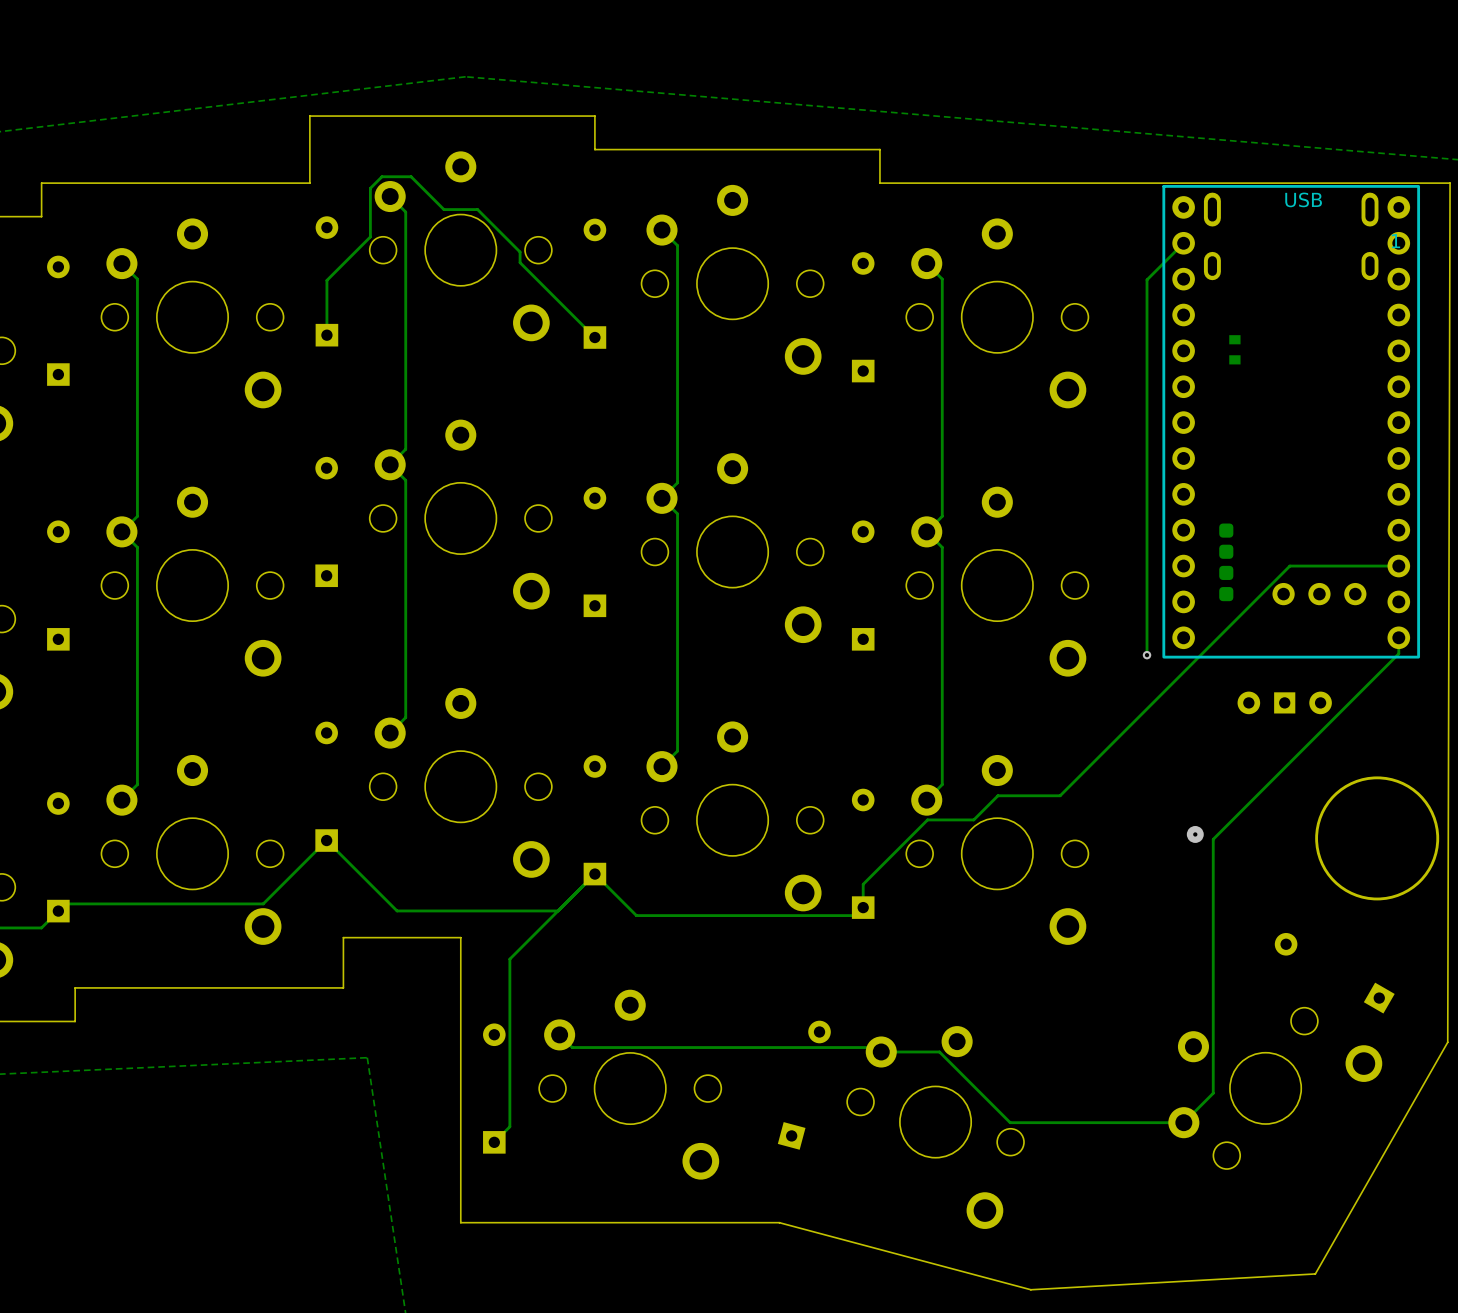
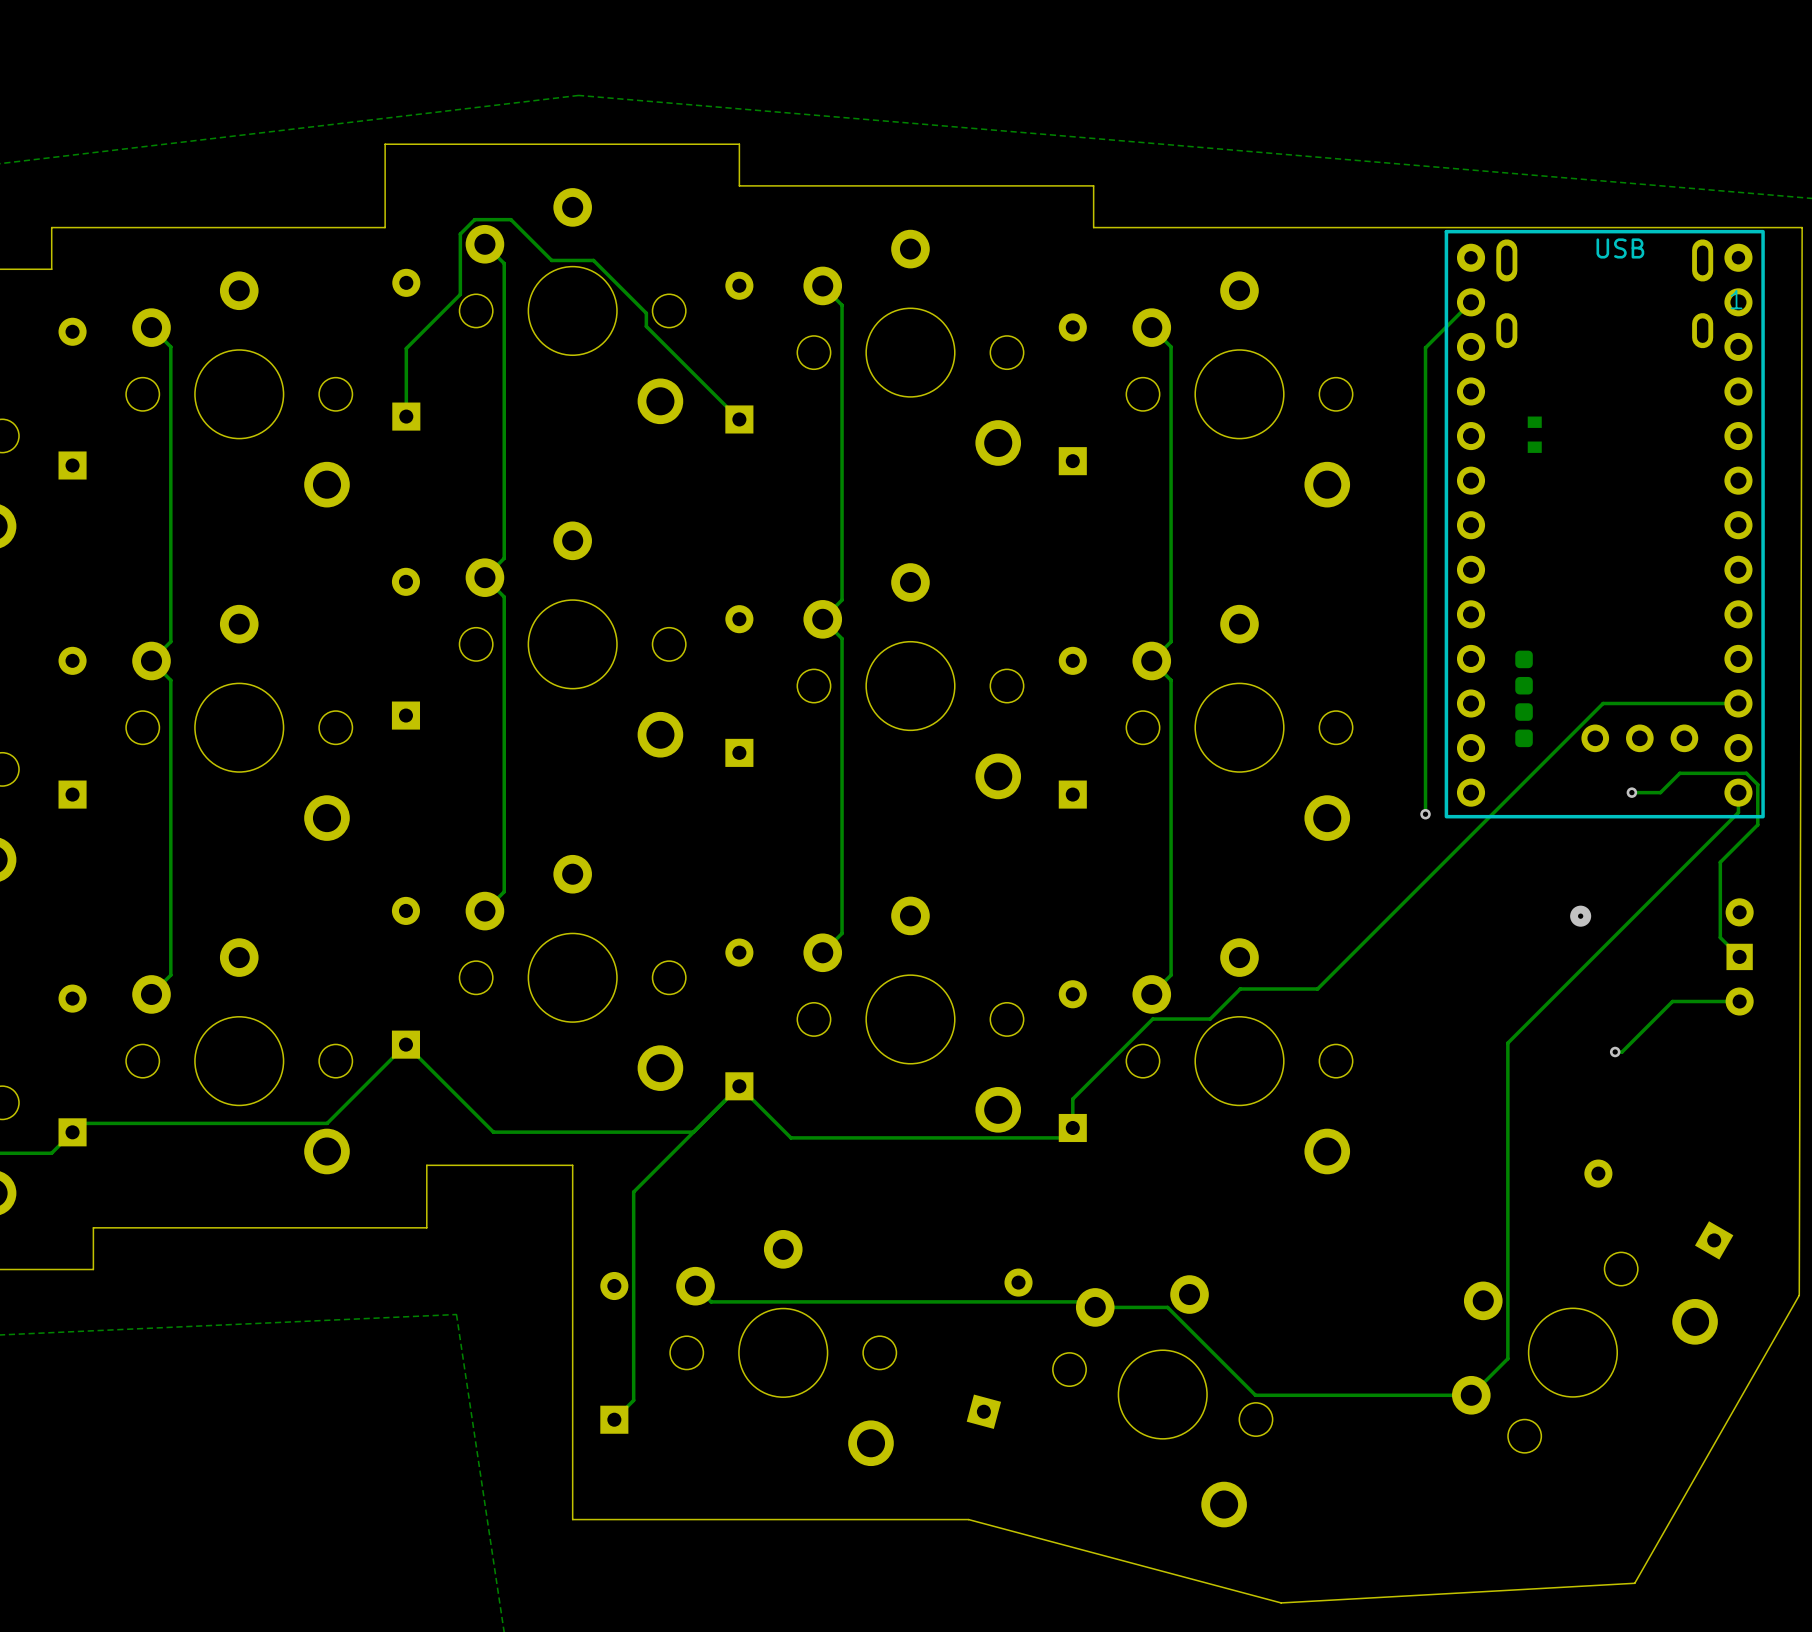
track: none -> (1631, 792) (1660, 792) (1679, 773) (1746, 773) (1757, 784) (1757, 824) (1720, 862) (1720, 937) (1739, 956)
via: none -> (1631, 792)
part rotation: 0° (1284, 702) -> 90° clockwise (1739, 956)
part position: (1284, 702) -> (1739, 956)
via: none -> (1580, 916)
round board edge: [1315, 776, 1440, 901] -> none
track: none -> (1739, 1001) (1672, 1001) (1622, 1052) (1615, 1052)
via: (1195, 834) -> none
via: none -> (1615, 1052)

